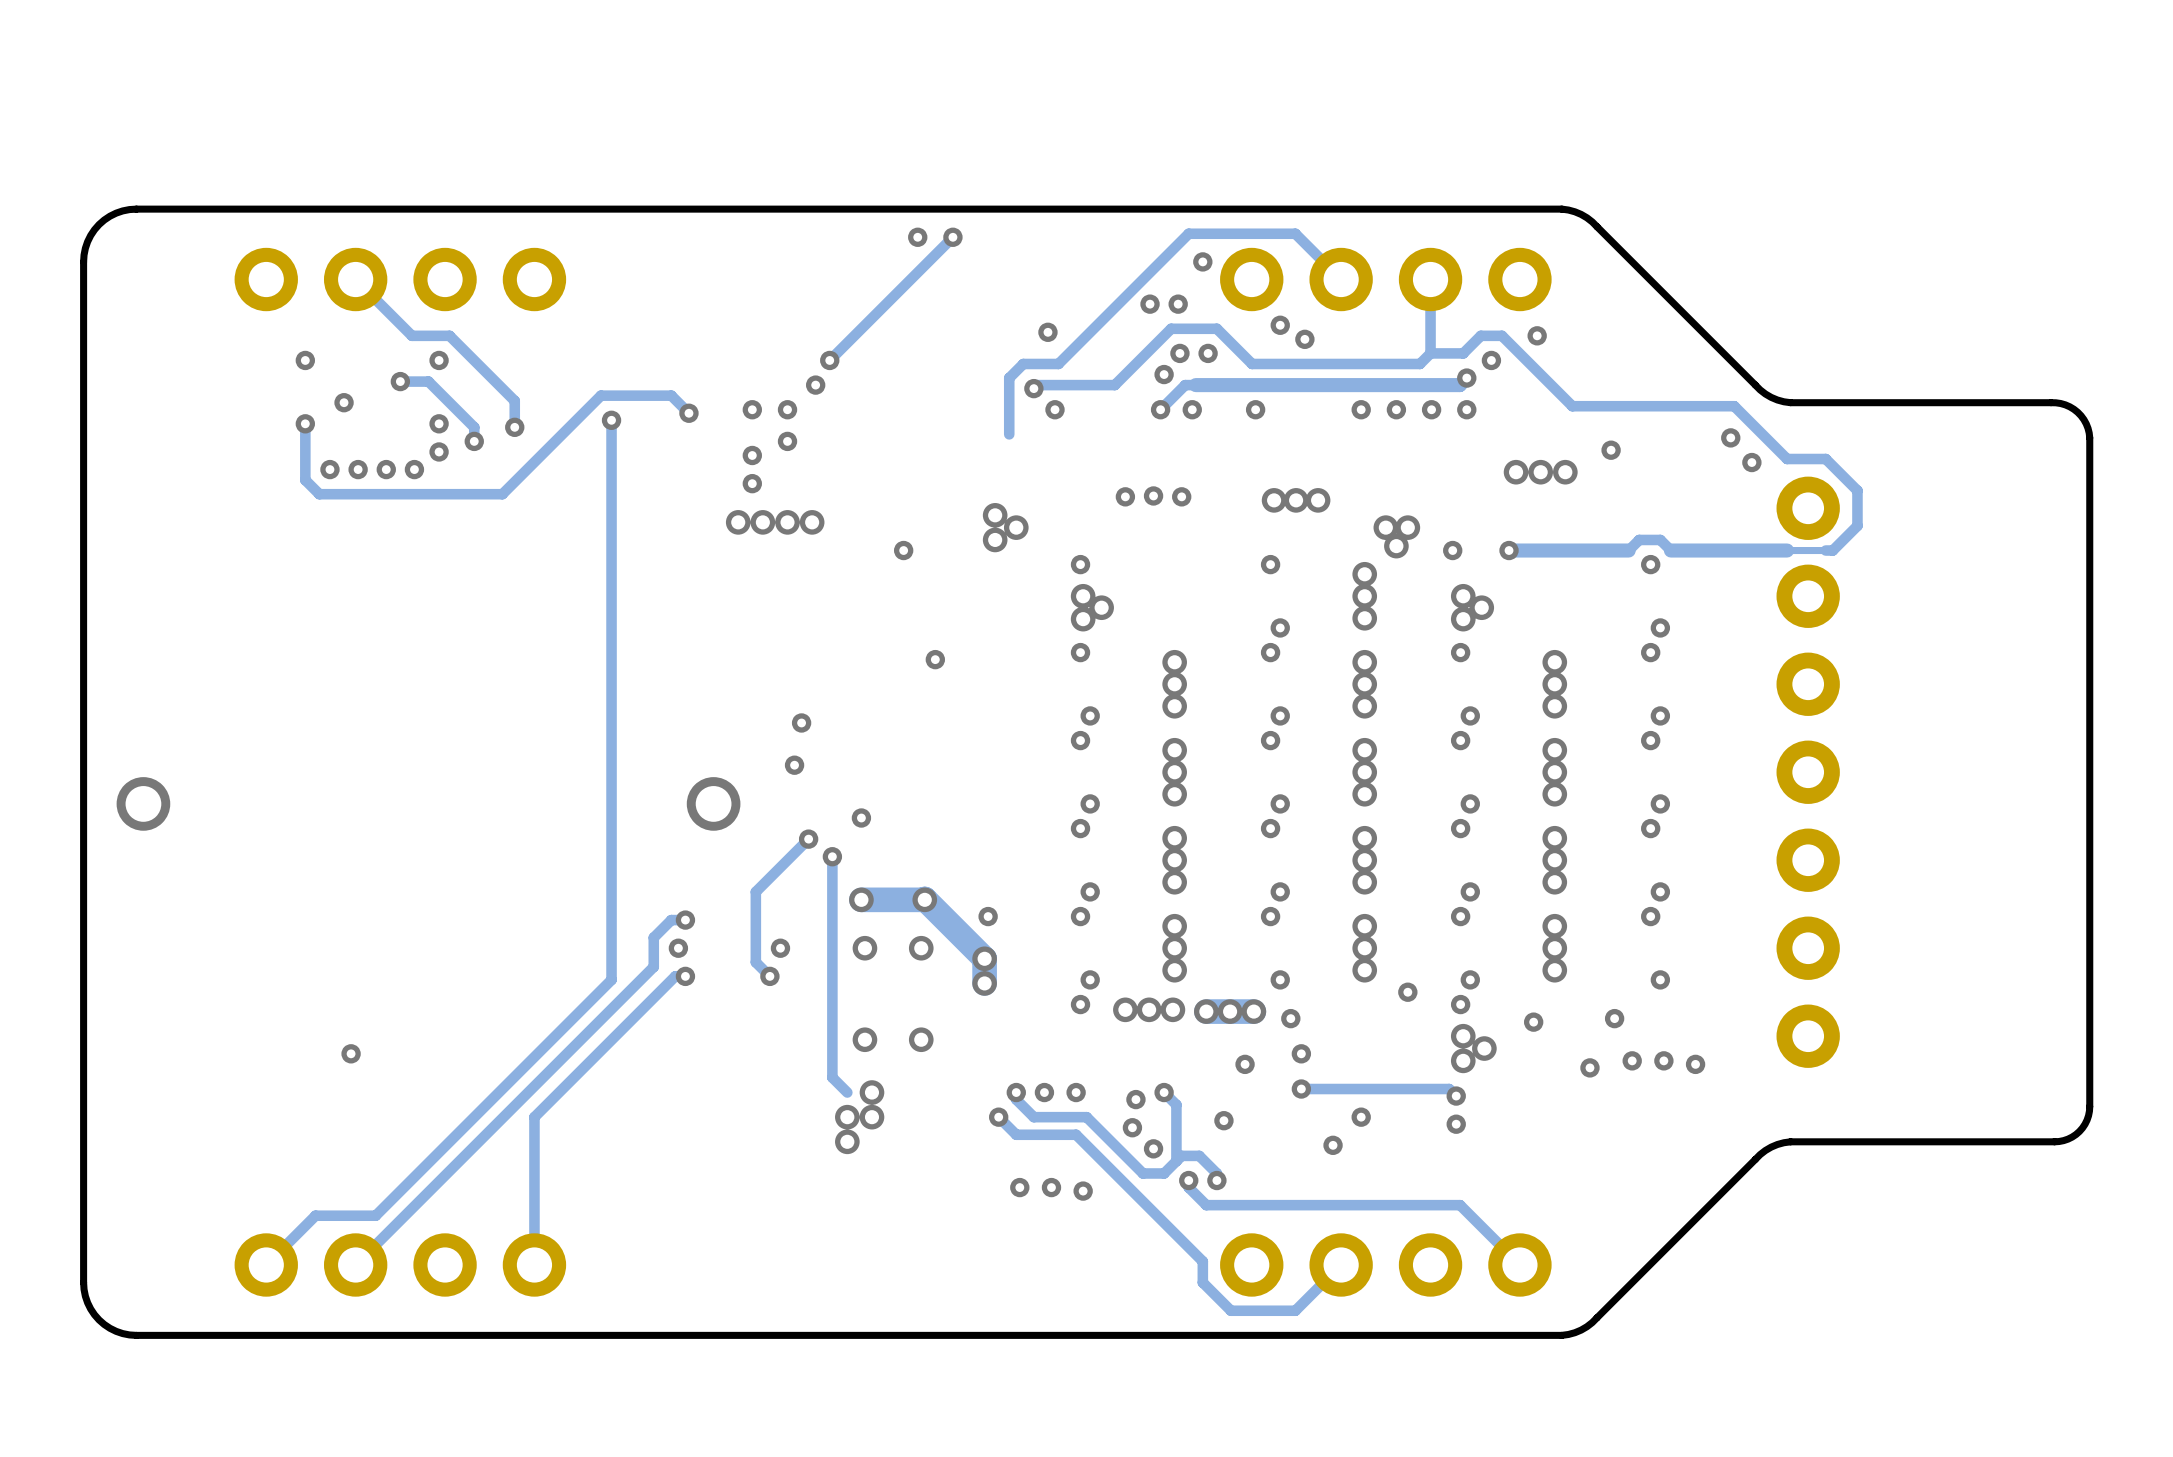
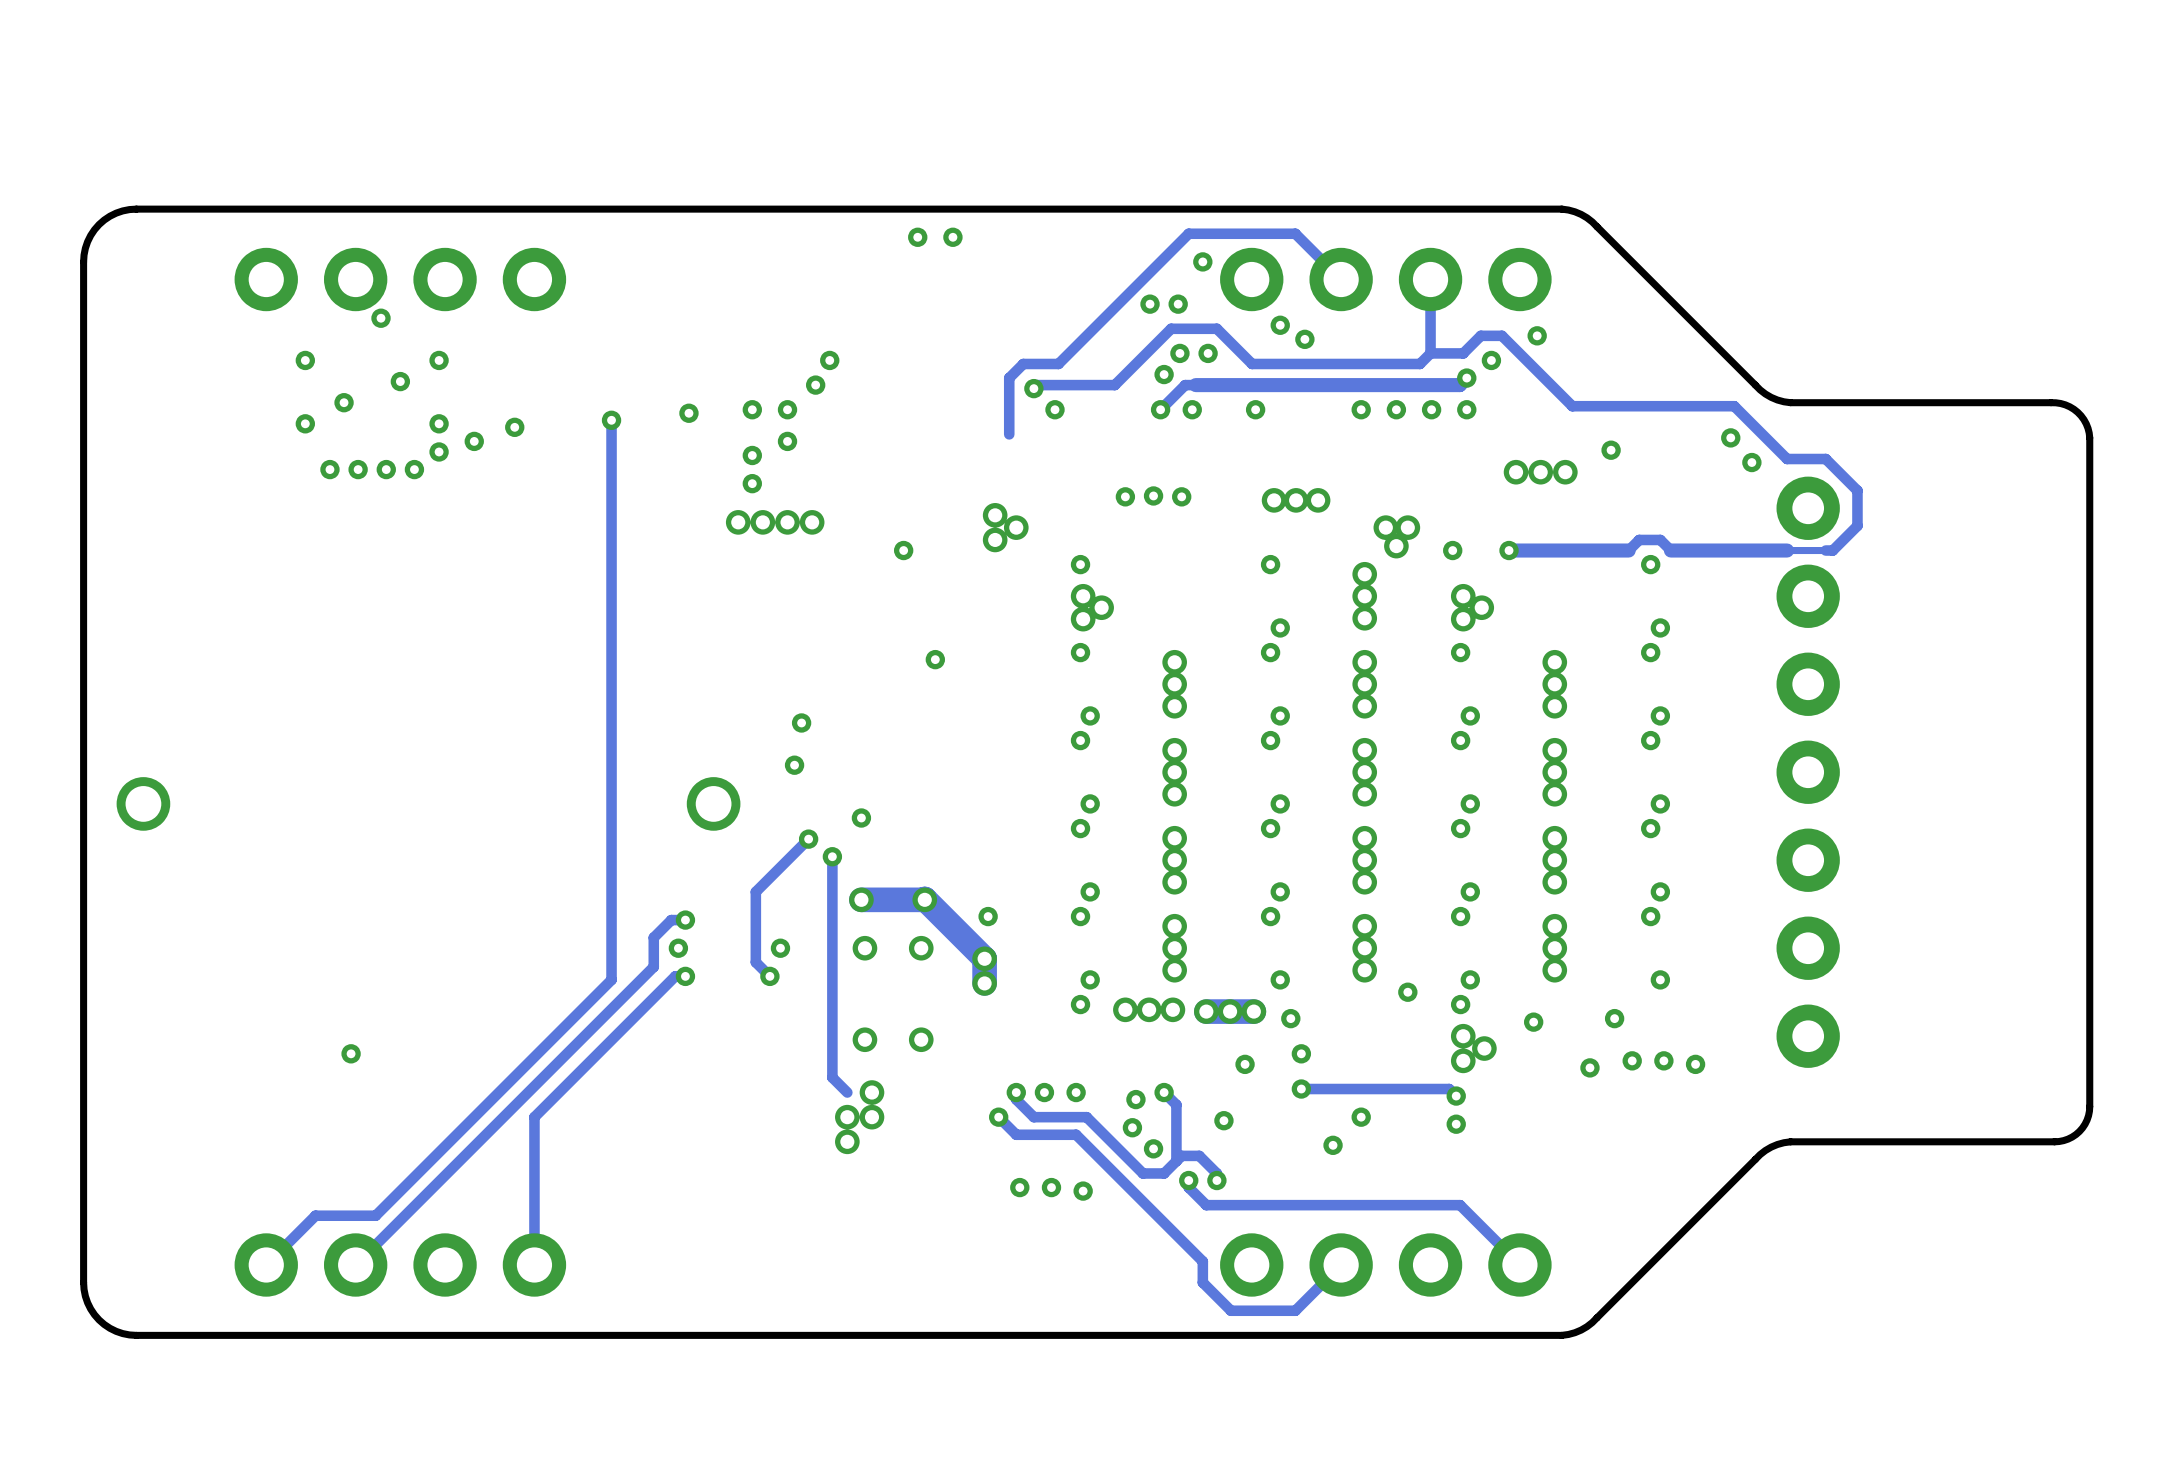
track: (952, 237) (829, 360) -> none
track: (355, 279) (411, 335) (449, 335) (514, 400) (514, 427) -> none
via: none -> (381, 318)
via: (1047, 332) -> none
track: (400, 381) (428, 381) (474, 427) (474, 441) -> none
track: (688, 413) (671, 395) (600, 395) (502, 494) (319, 494) (305, 480) (305, 423) -> none

